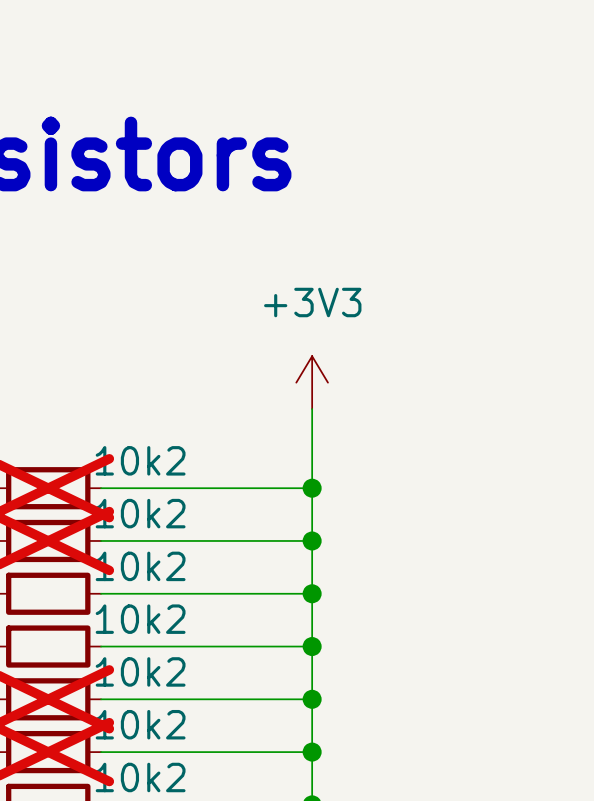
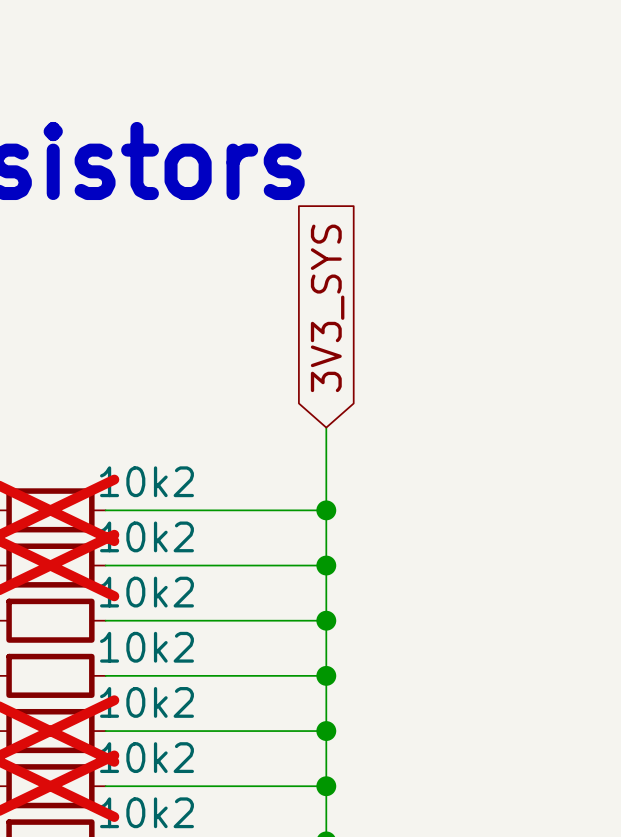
global label: none -> 3V3_SYS (327, 308)
power symbol: +3V3 (312, 382) -> none

